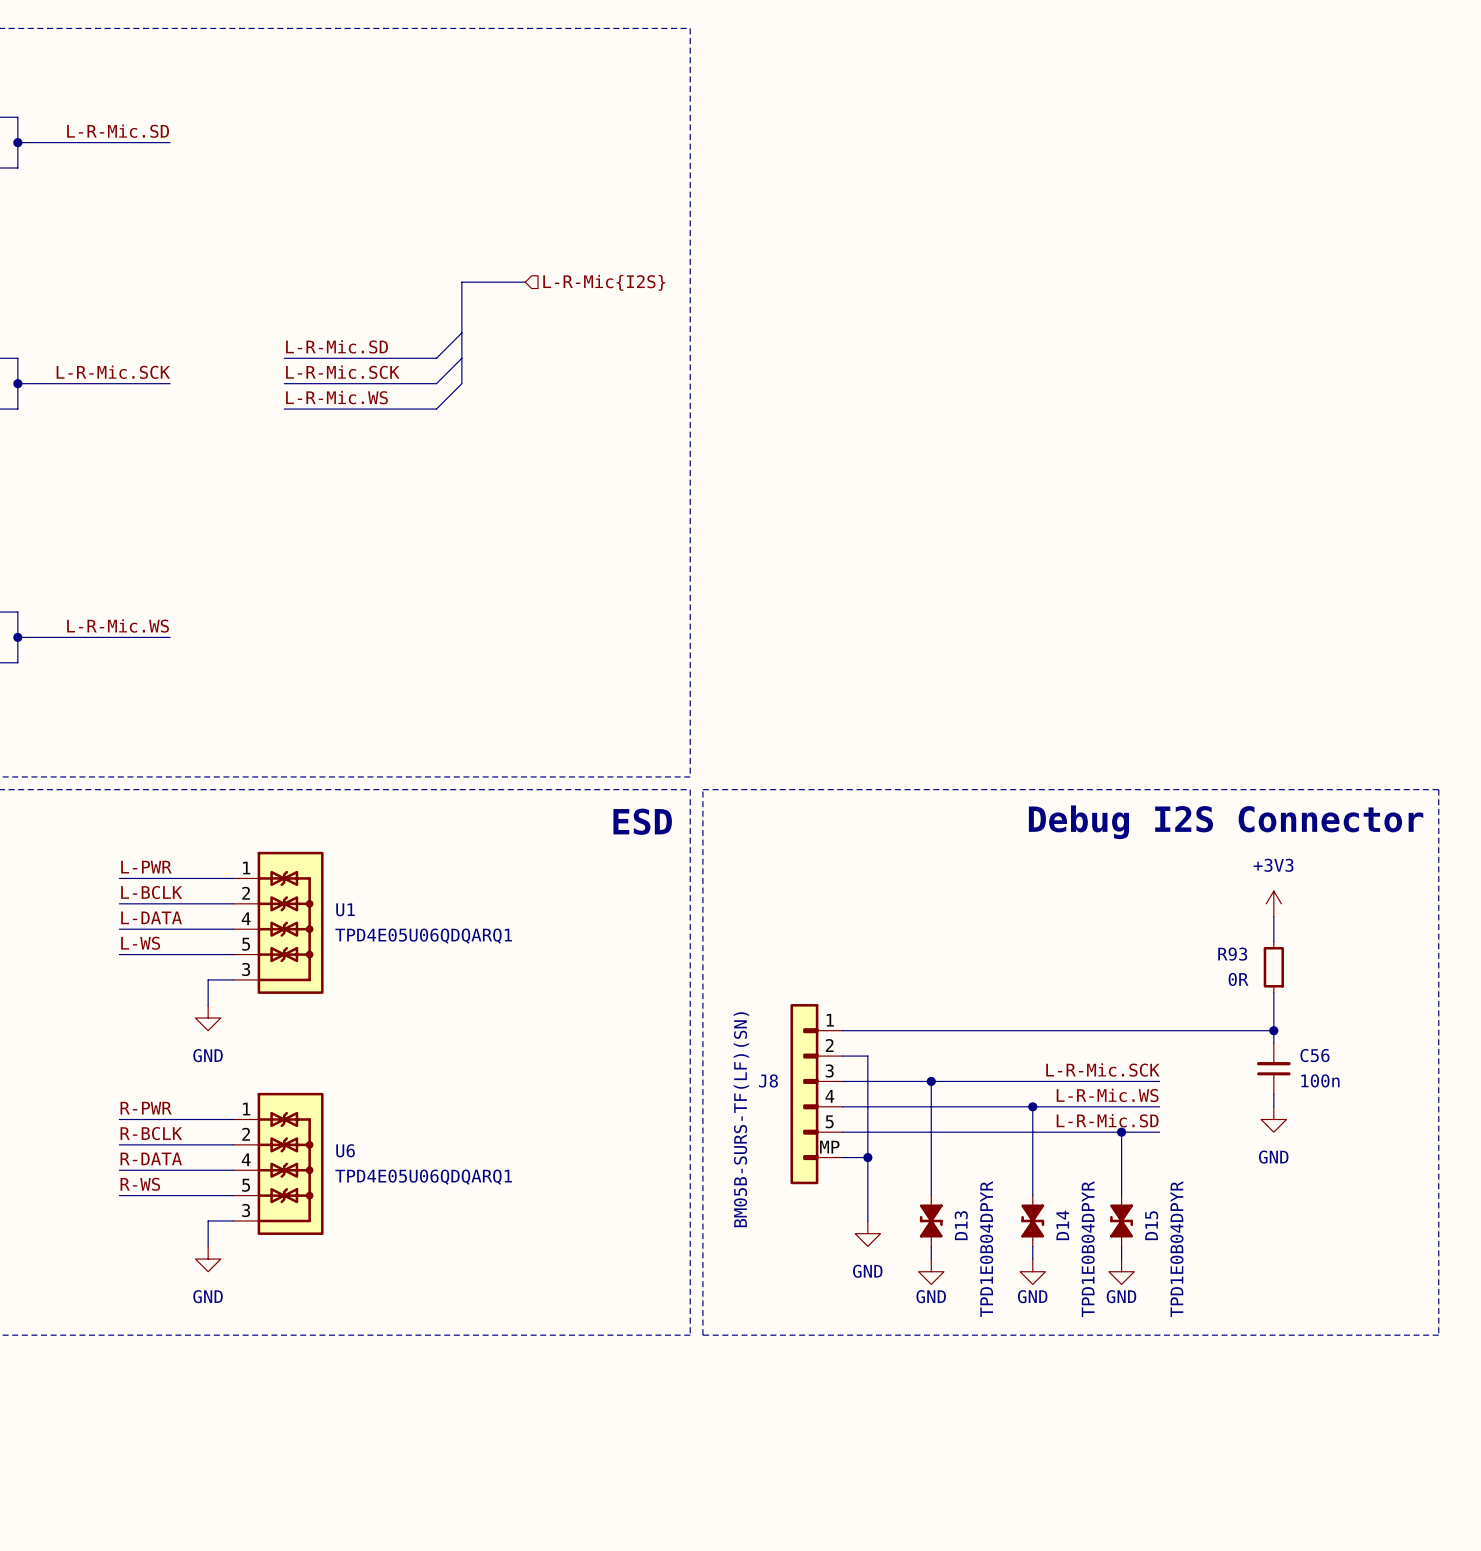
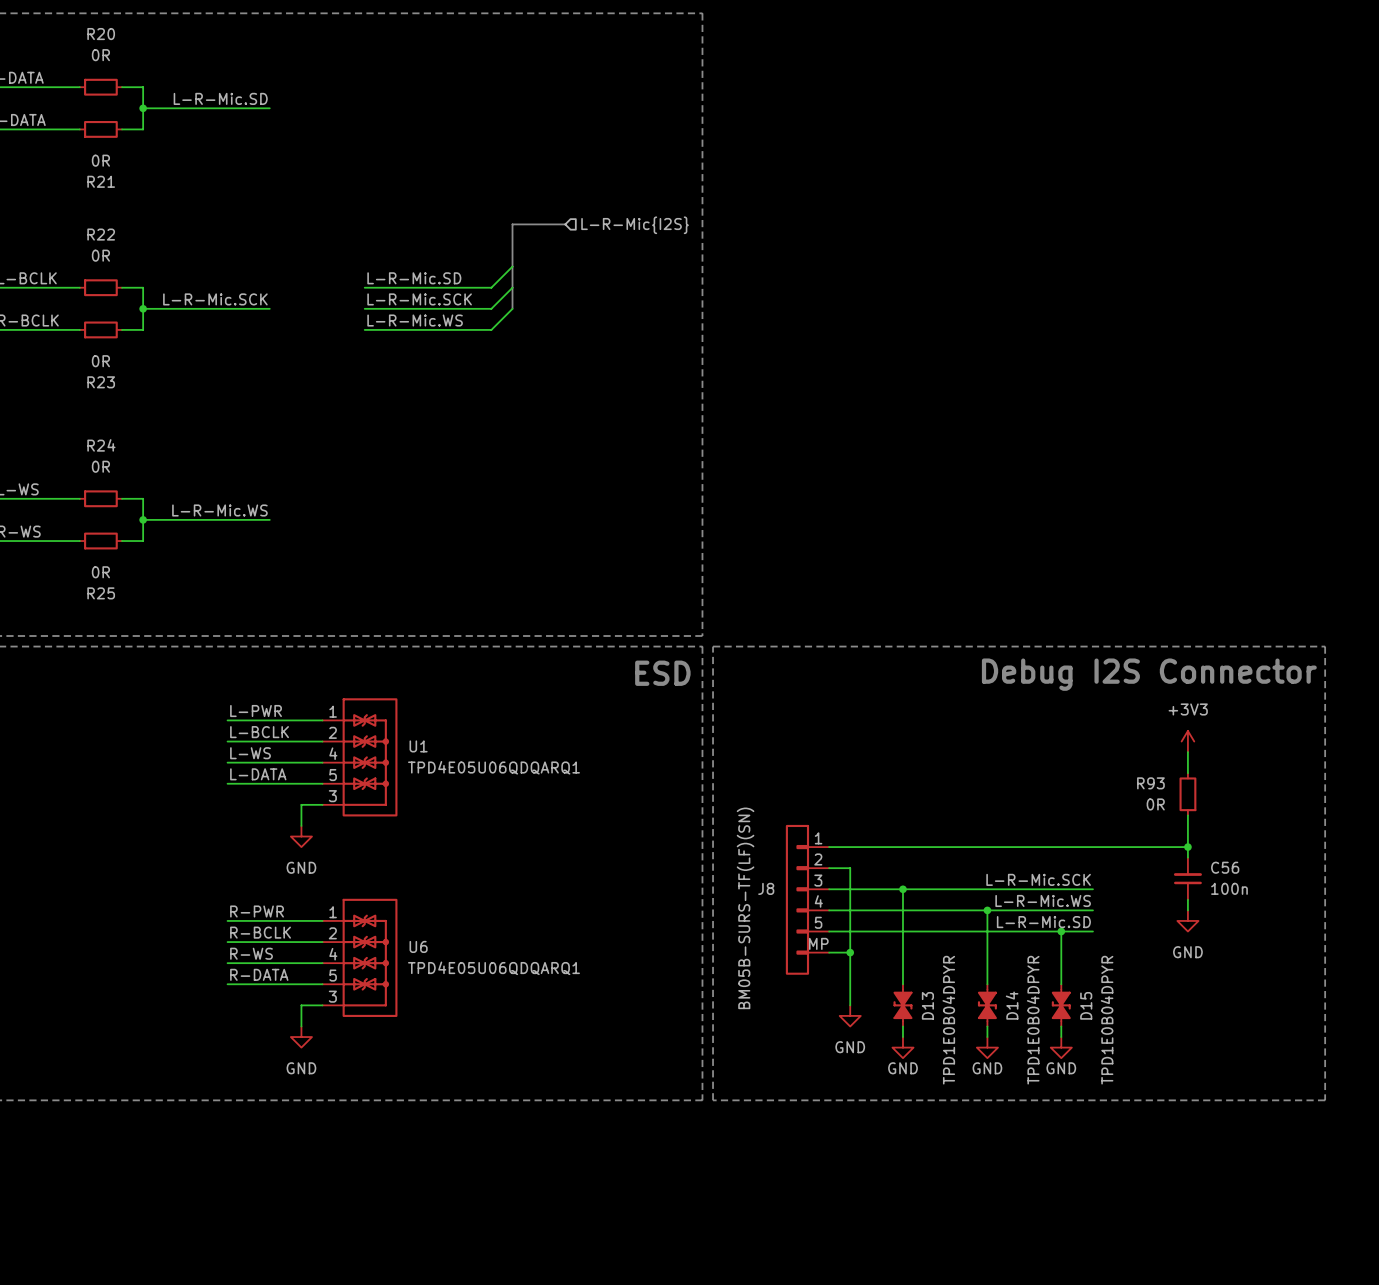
label: L-DATA (151, 917) -> L-WS (250, 753)
label: L-WS (140, 943) -> L-DATA (258, 774)
label: R-DATA (151, 1158) -> R-WS (251, 953)
label: R-WS (140, 1184) -> R-DATA (259, 974)

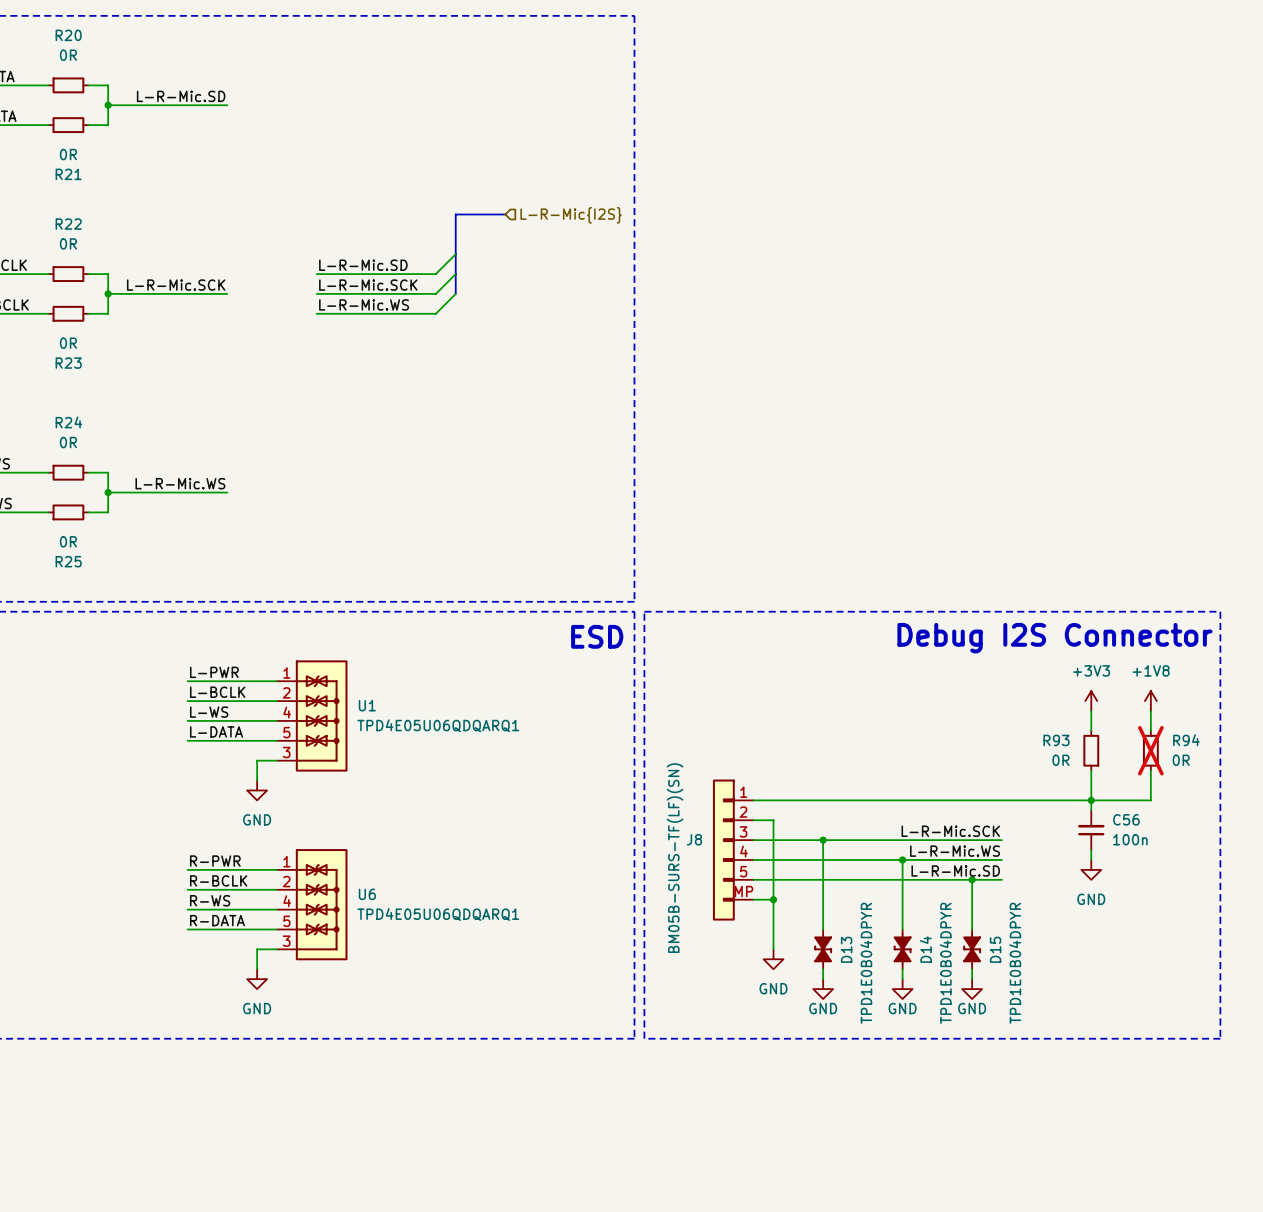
power symbol: none -> +1V8 (1150, 701)
wire: none -> (1150, 711) (1150, 730)
R94: none -> (1150, 750)
wire: none -> (1150, 770) (1150, 800) (1091, 800)

